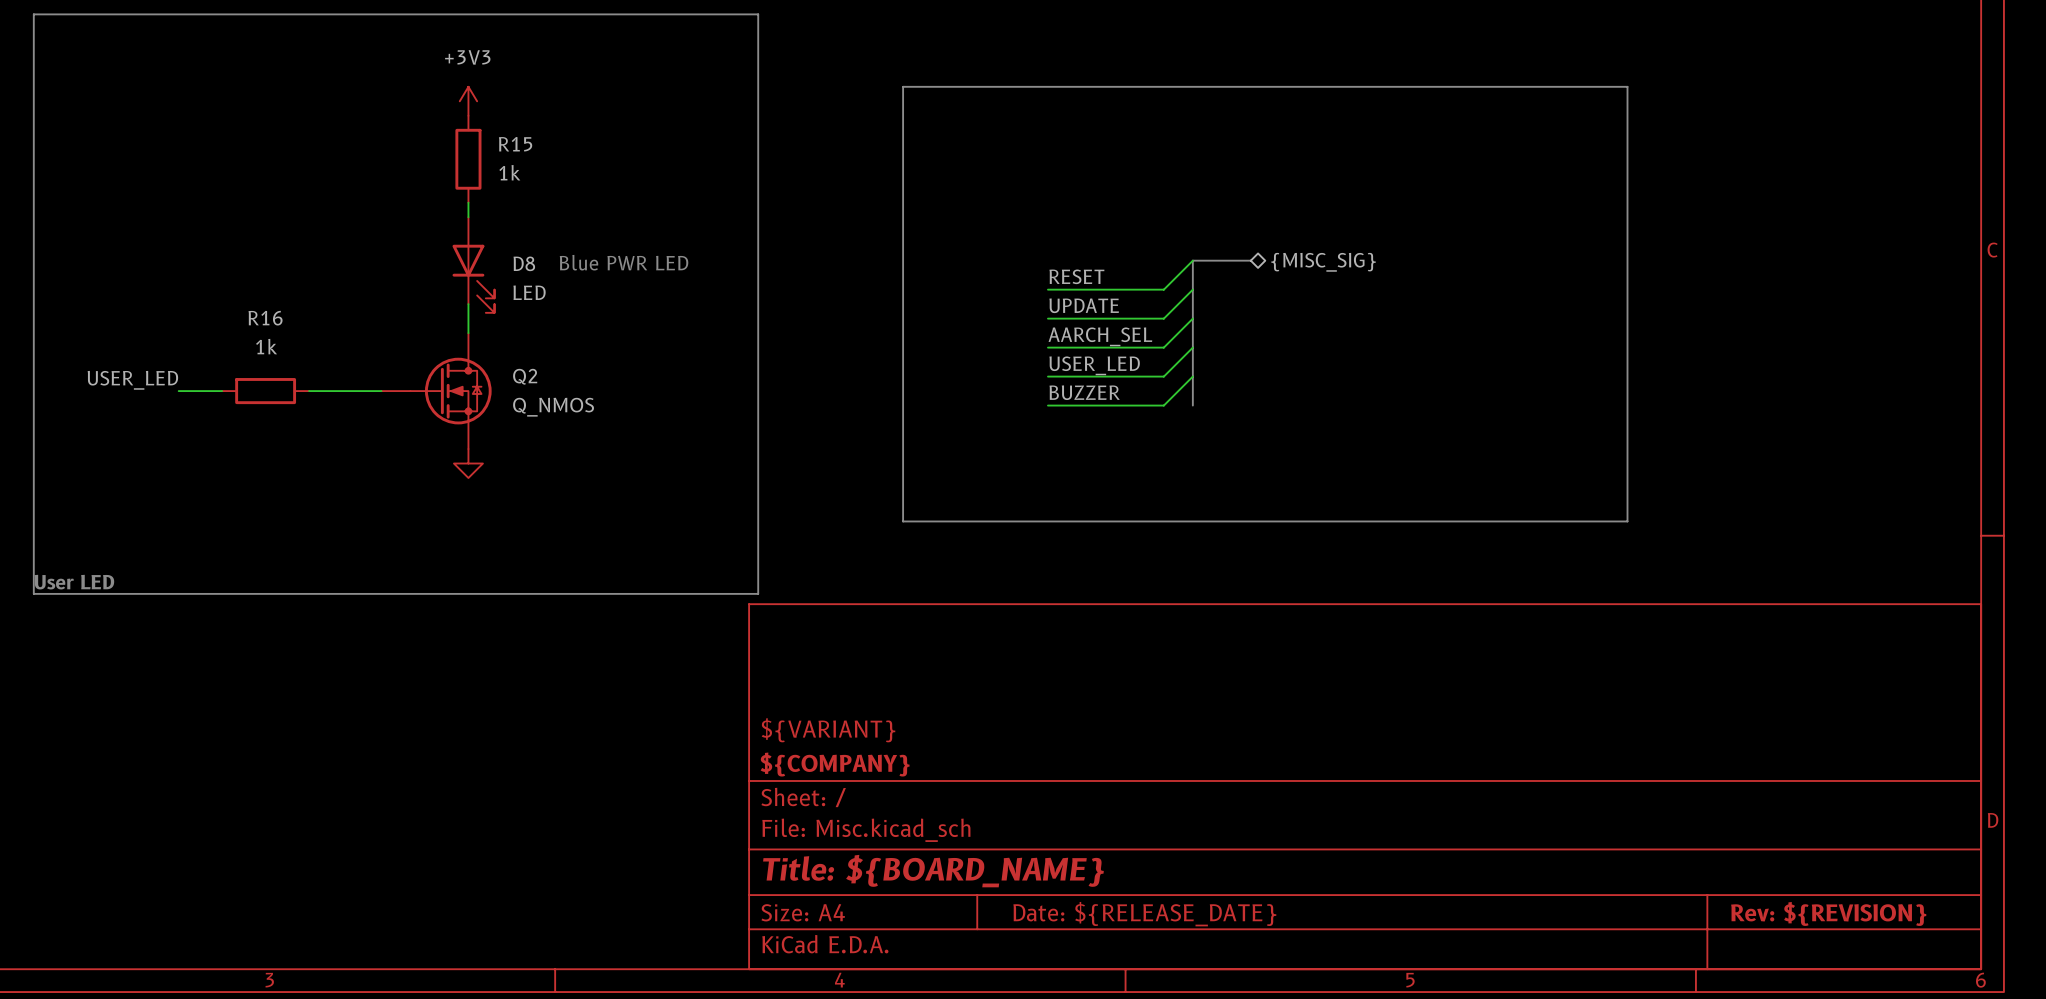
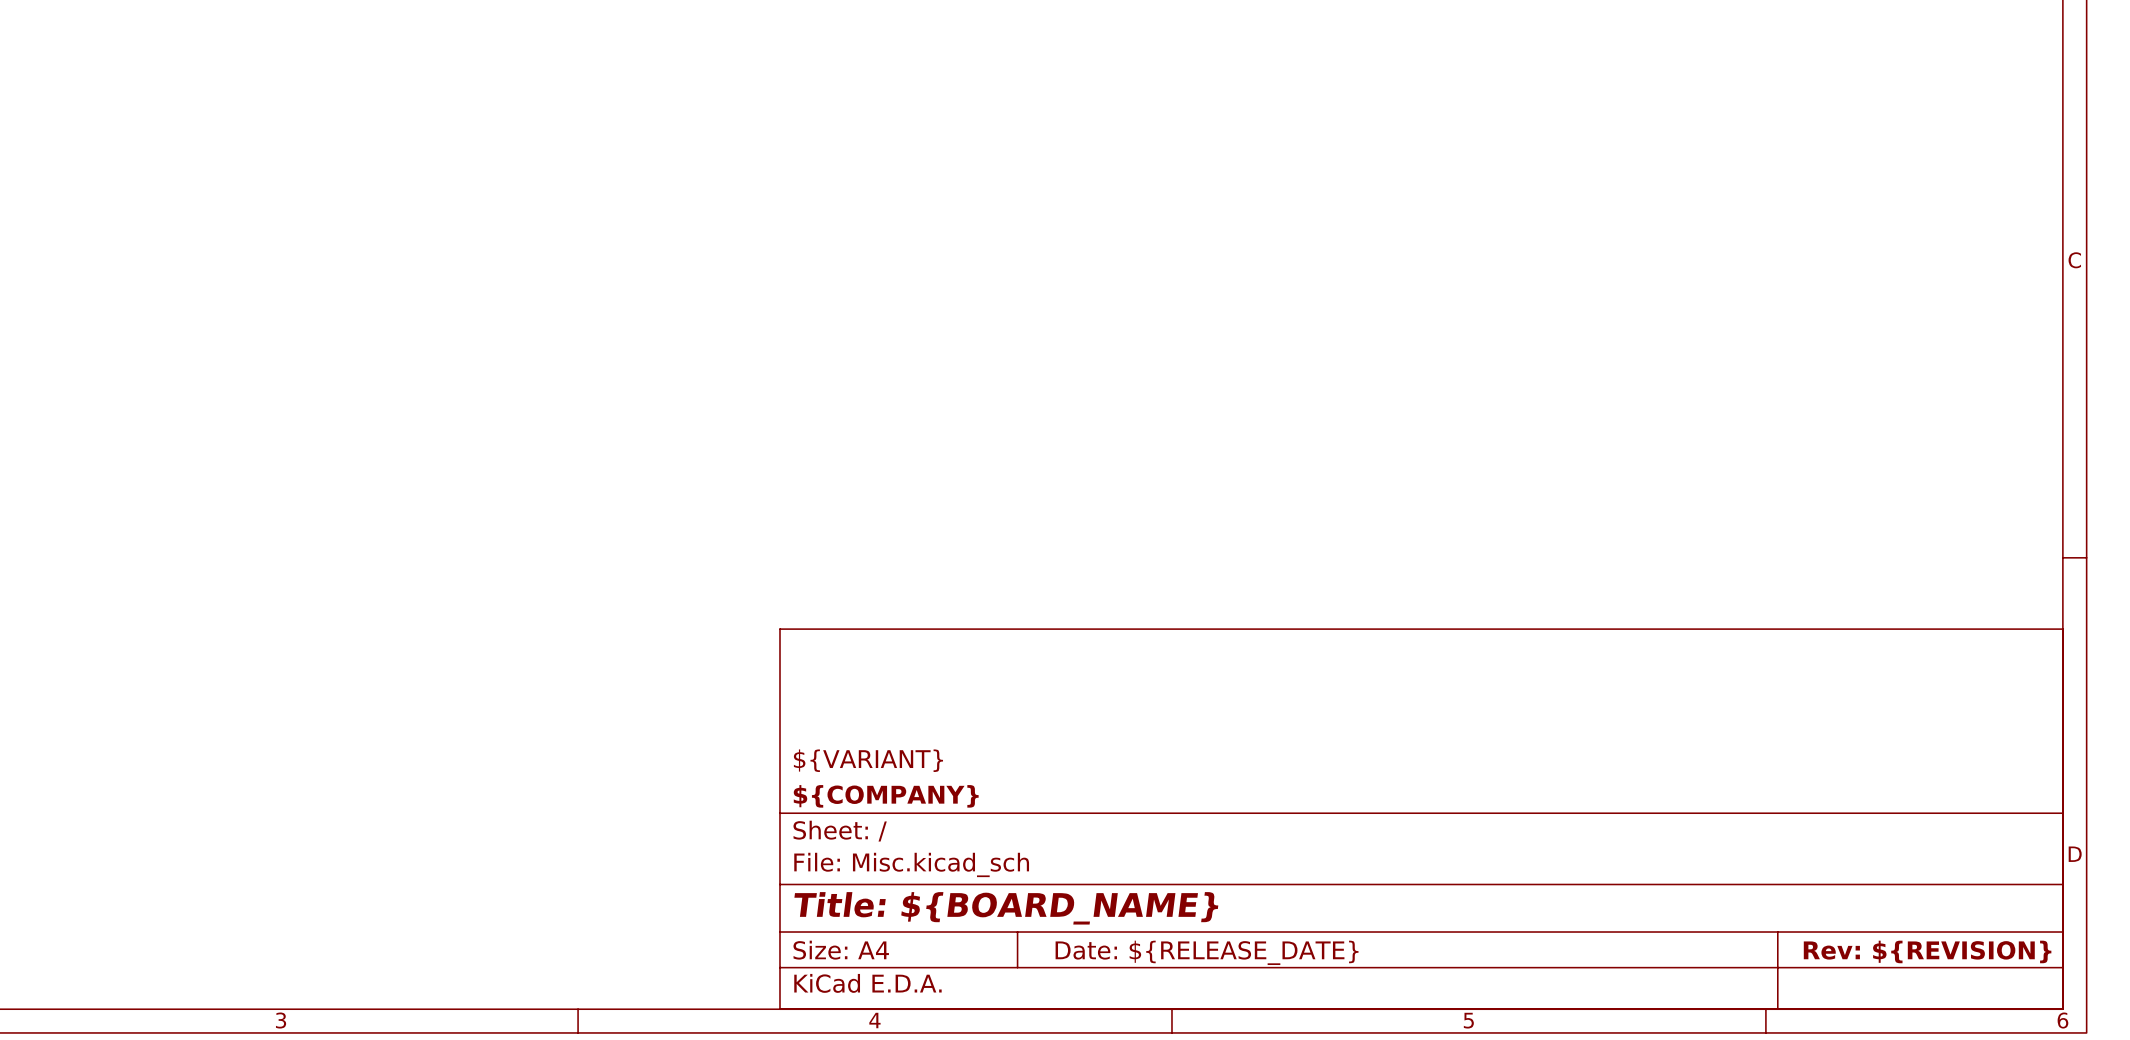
line: (33, 14) (758, 14) (758, 593) (33, 593) (33, 14) -> none
line: (903, 86) (1627, 86) (1627, 521) (903, 521) (903, 86) -> none
power symbol: +3V3 (468, 101) -> none
R15: 1k (468, 159) -> none
wire: (468, 202) (468, 217) -> none
wire: (1192, 260) (1163, 289) (1047, 289) -> none
bus: (1250, 260) (1192, 260) (1192, 405) -> none
text: Blue PWR LED (624, 262) -> none
hierarchical label: {MISC_SIG} (1323, 262) -> none
D8: LED (473, 265) -> none
label: RESET (1076, 276) -> none
wire: (1192, 289) (1163, 318) (1047, 318) -> none
wire: (468, 304) (468, 333) -> none
label: UPDATE (1084, 305) -> none
wire: (1192, 318) (1163, 347) (1047, 347) -> none
label: AARCH_SEL (1100, 336) -> none
wire: (1192, 347) (1163, 376) (1047, 376) -> none
label: USER_LED (1094, 365) -> none
wire: (1192, 376) (1163, 405) (1047, 405) -> none
label: USER_LED (132, 380) -> none
wire: (178, 391) (222, 391) -> none
R16: 1k (265, 391) -> none
wire: (309, 391) (381, 391) -> none
Q2: Q_NMOS (436, 391) -> none
label: BUZZER (1084, 392) -> none
power symbol: (468, 463) -> none
text: User LED (74, 582) -> none

